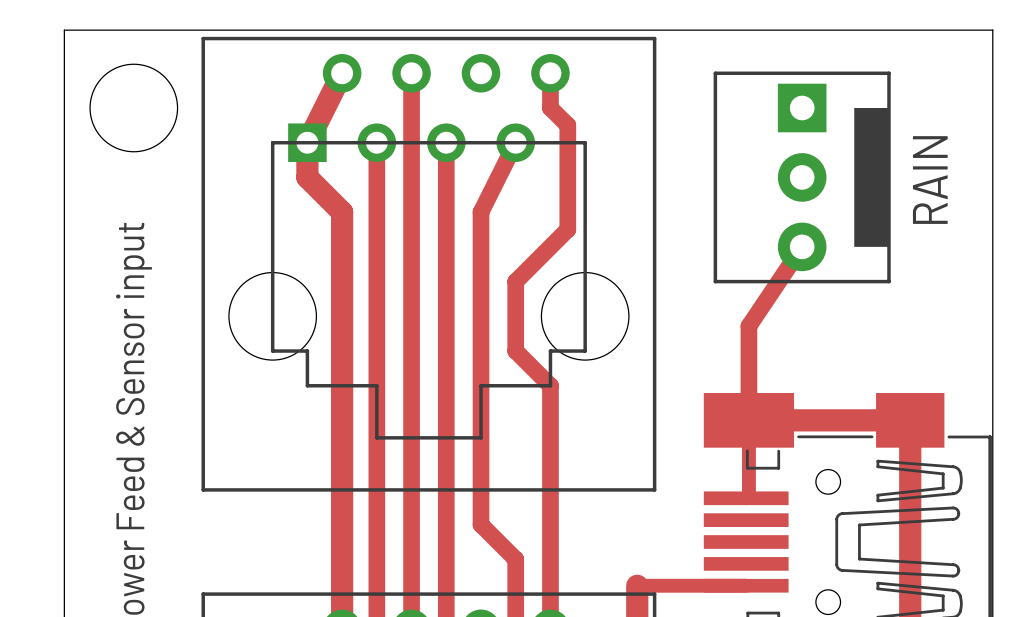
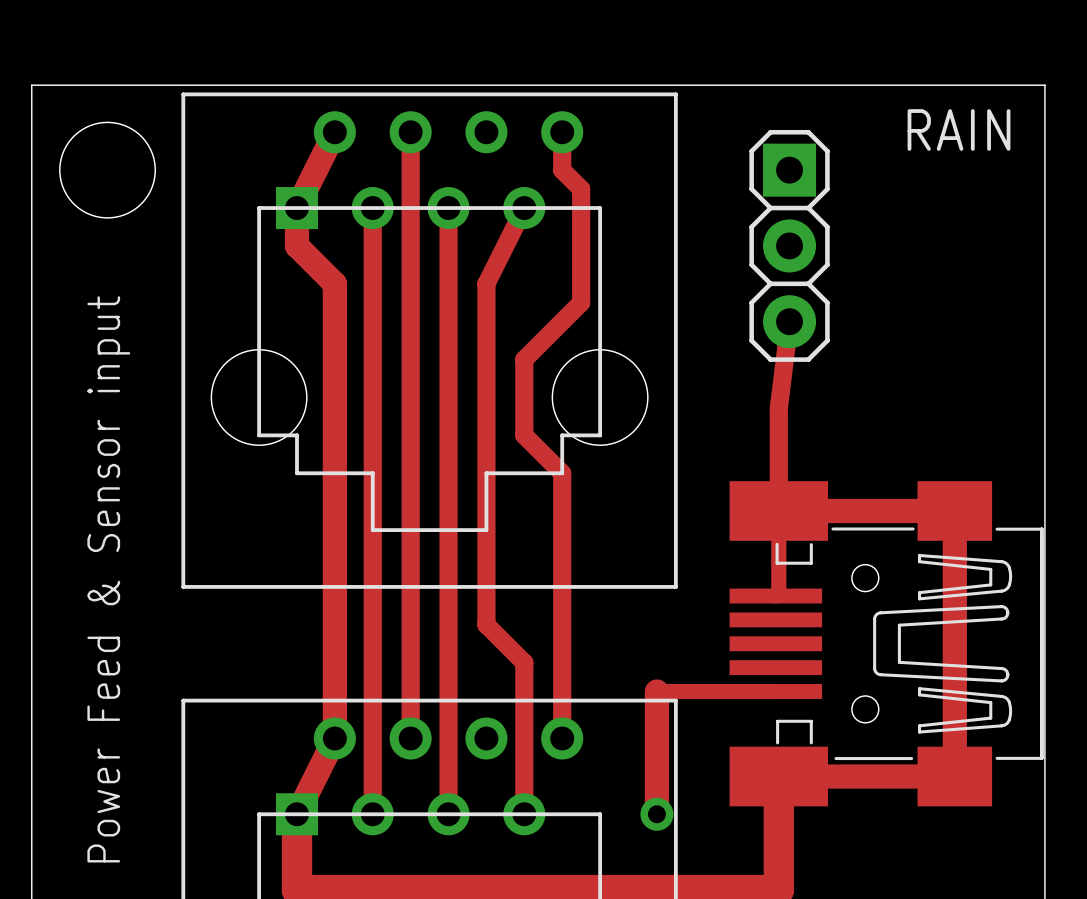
RAIN: none -> (789, 245)
RAIN: (802, 177) -> none
track: (802, 246) (748, 326) -> (789, 321) (778, 408)

